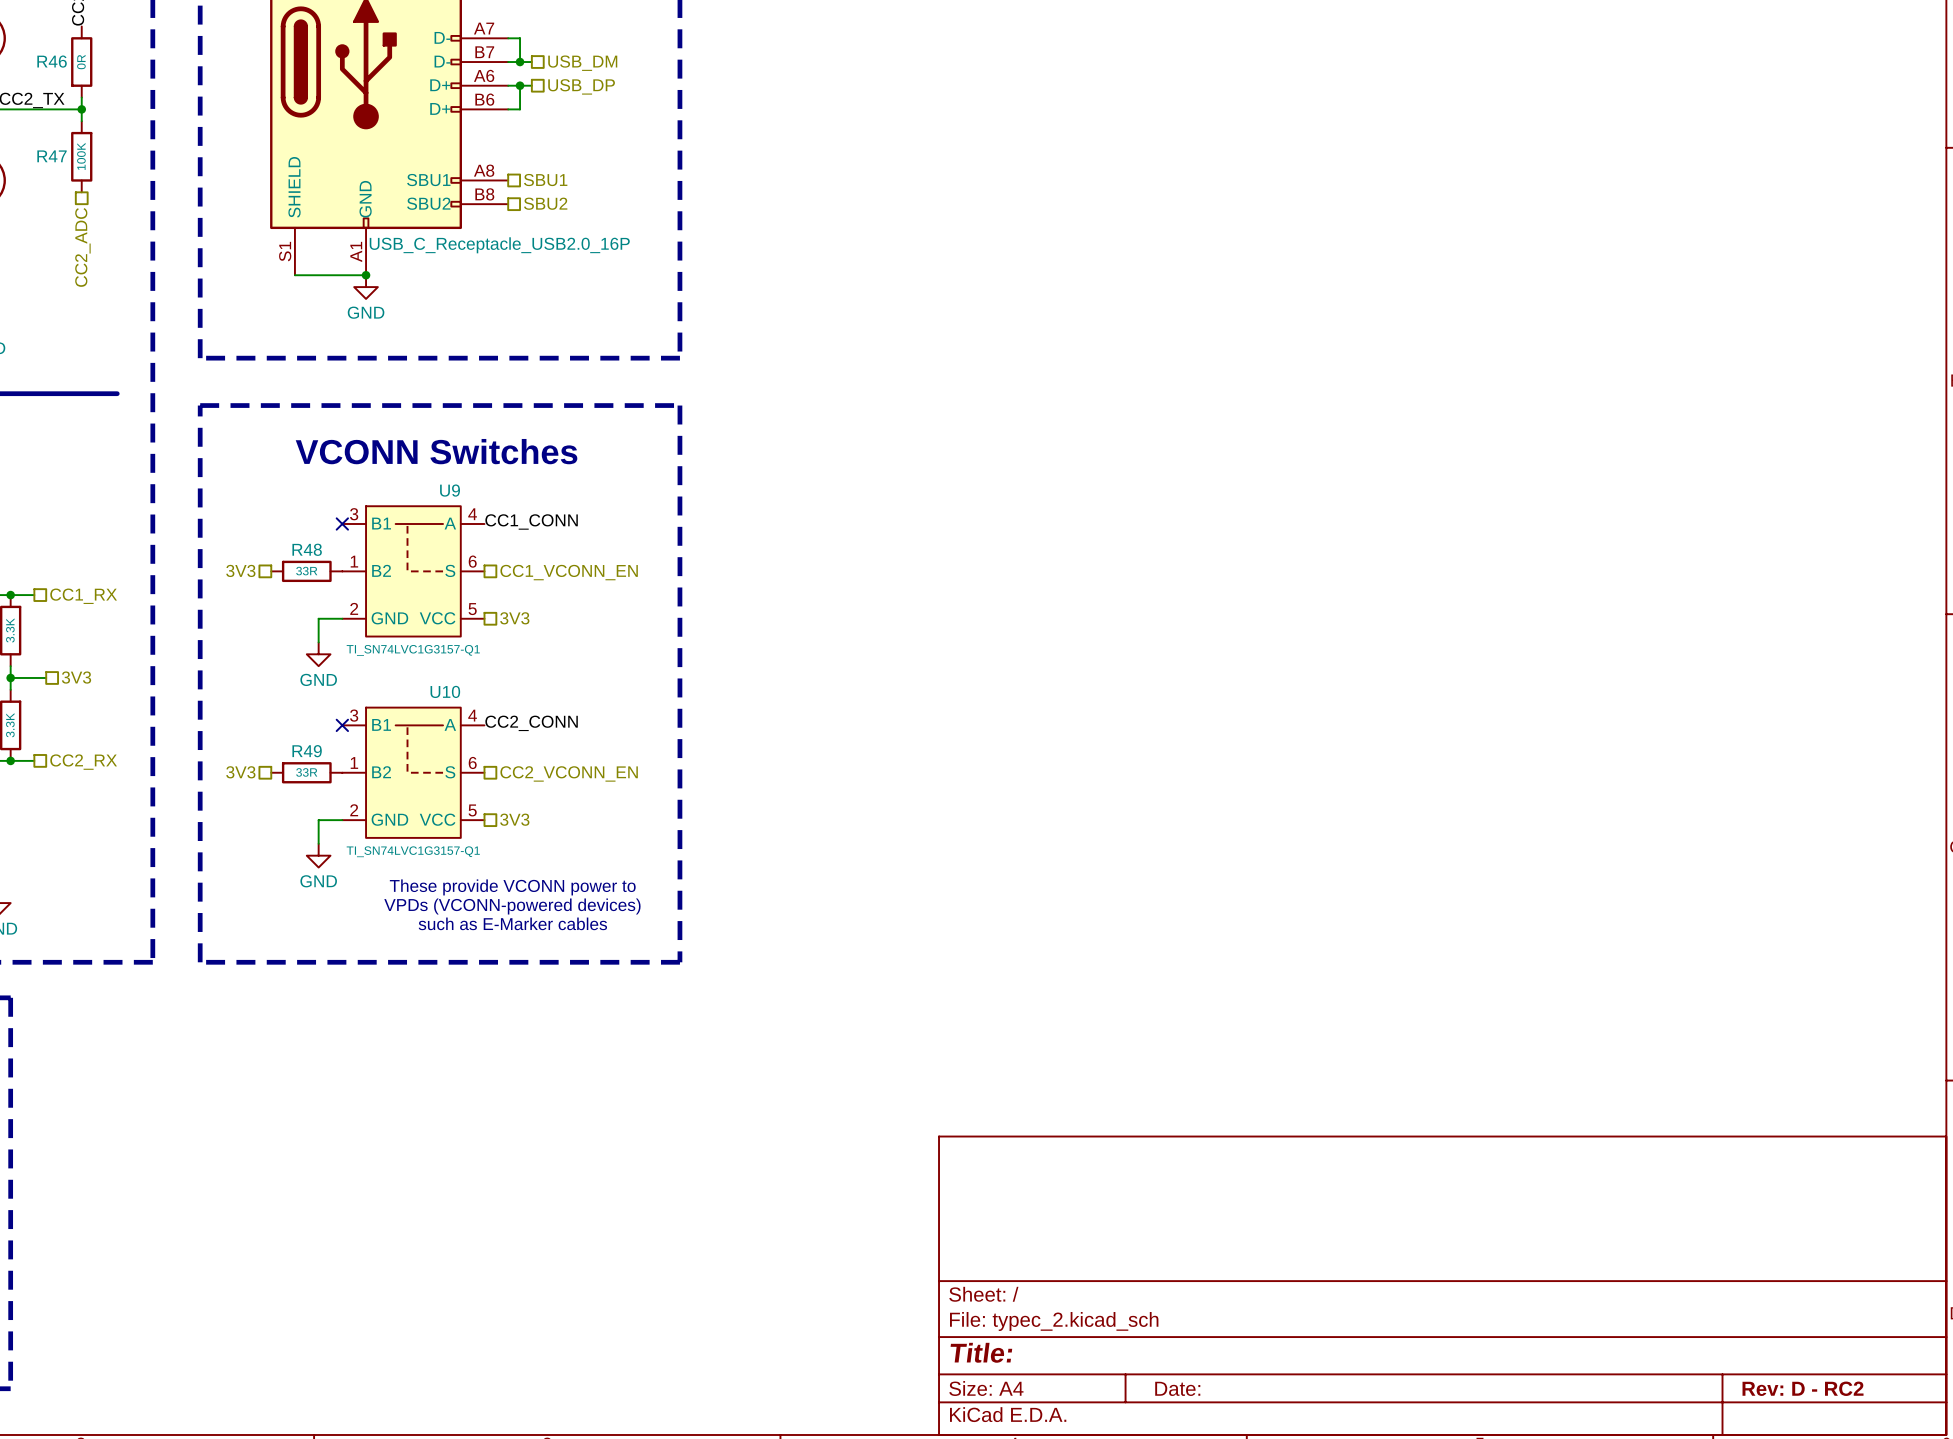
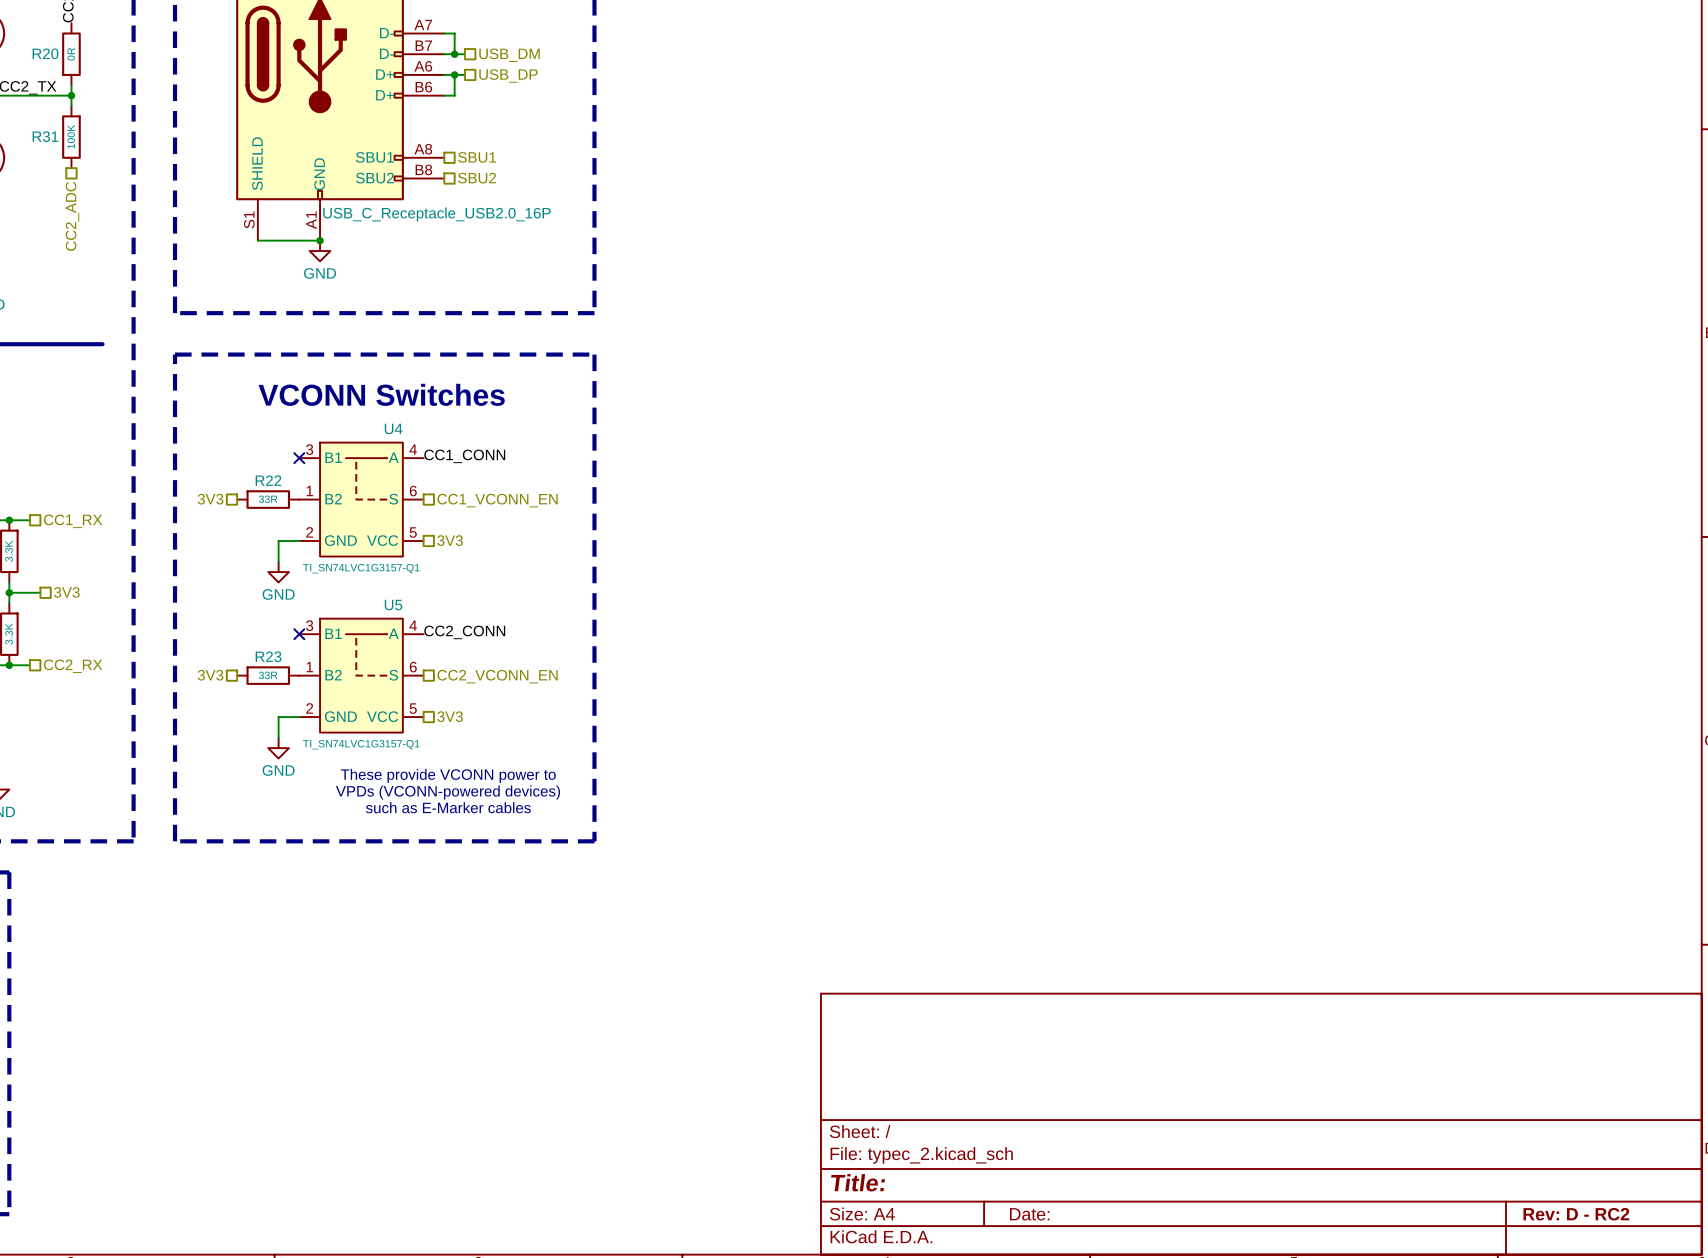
R46 name: R46 (52, 61) -> R20 (45, 53)
R47 name: R47 (52, 156) -> R31 (45, 136)
U9 name: U9 (450, 490) -> U4 (393, 428)
R48 name: R48 (307, 549) -> R22 (268, 480)
U10 name: U10 (445, 691) -> U5 (393, 605)
R49 name: R49 (307, 751) -> R23 (268, 656)

